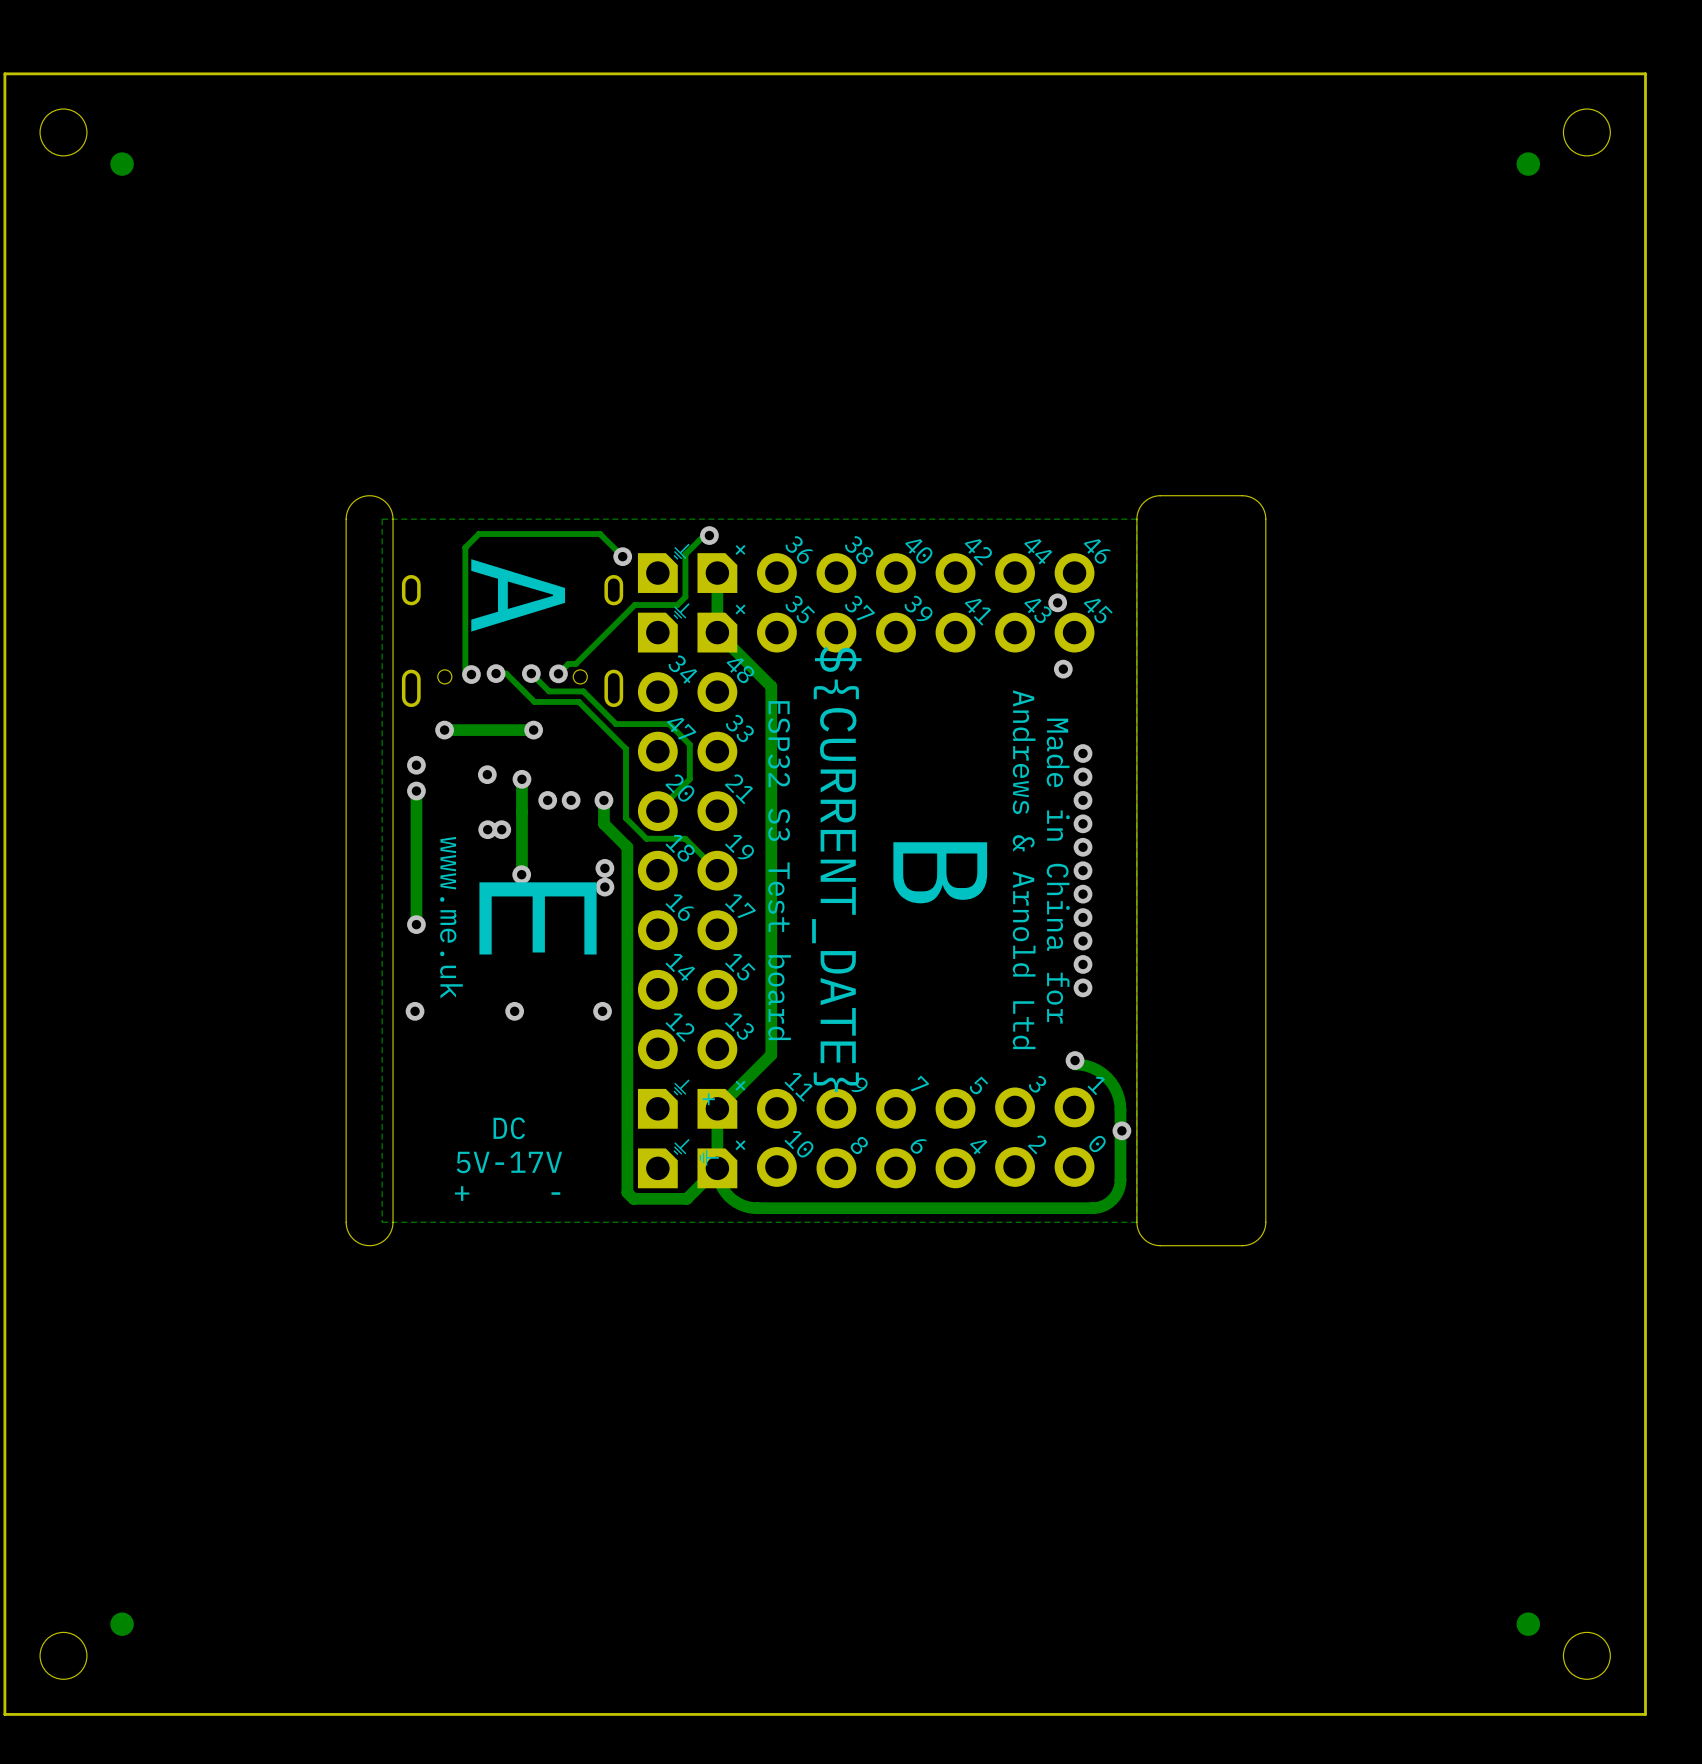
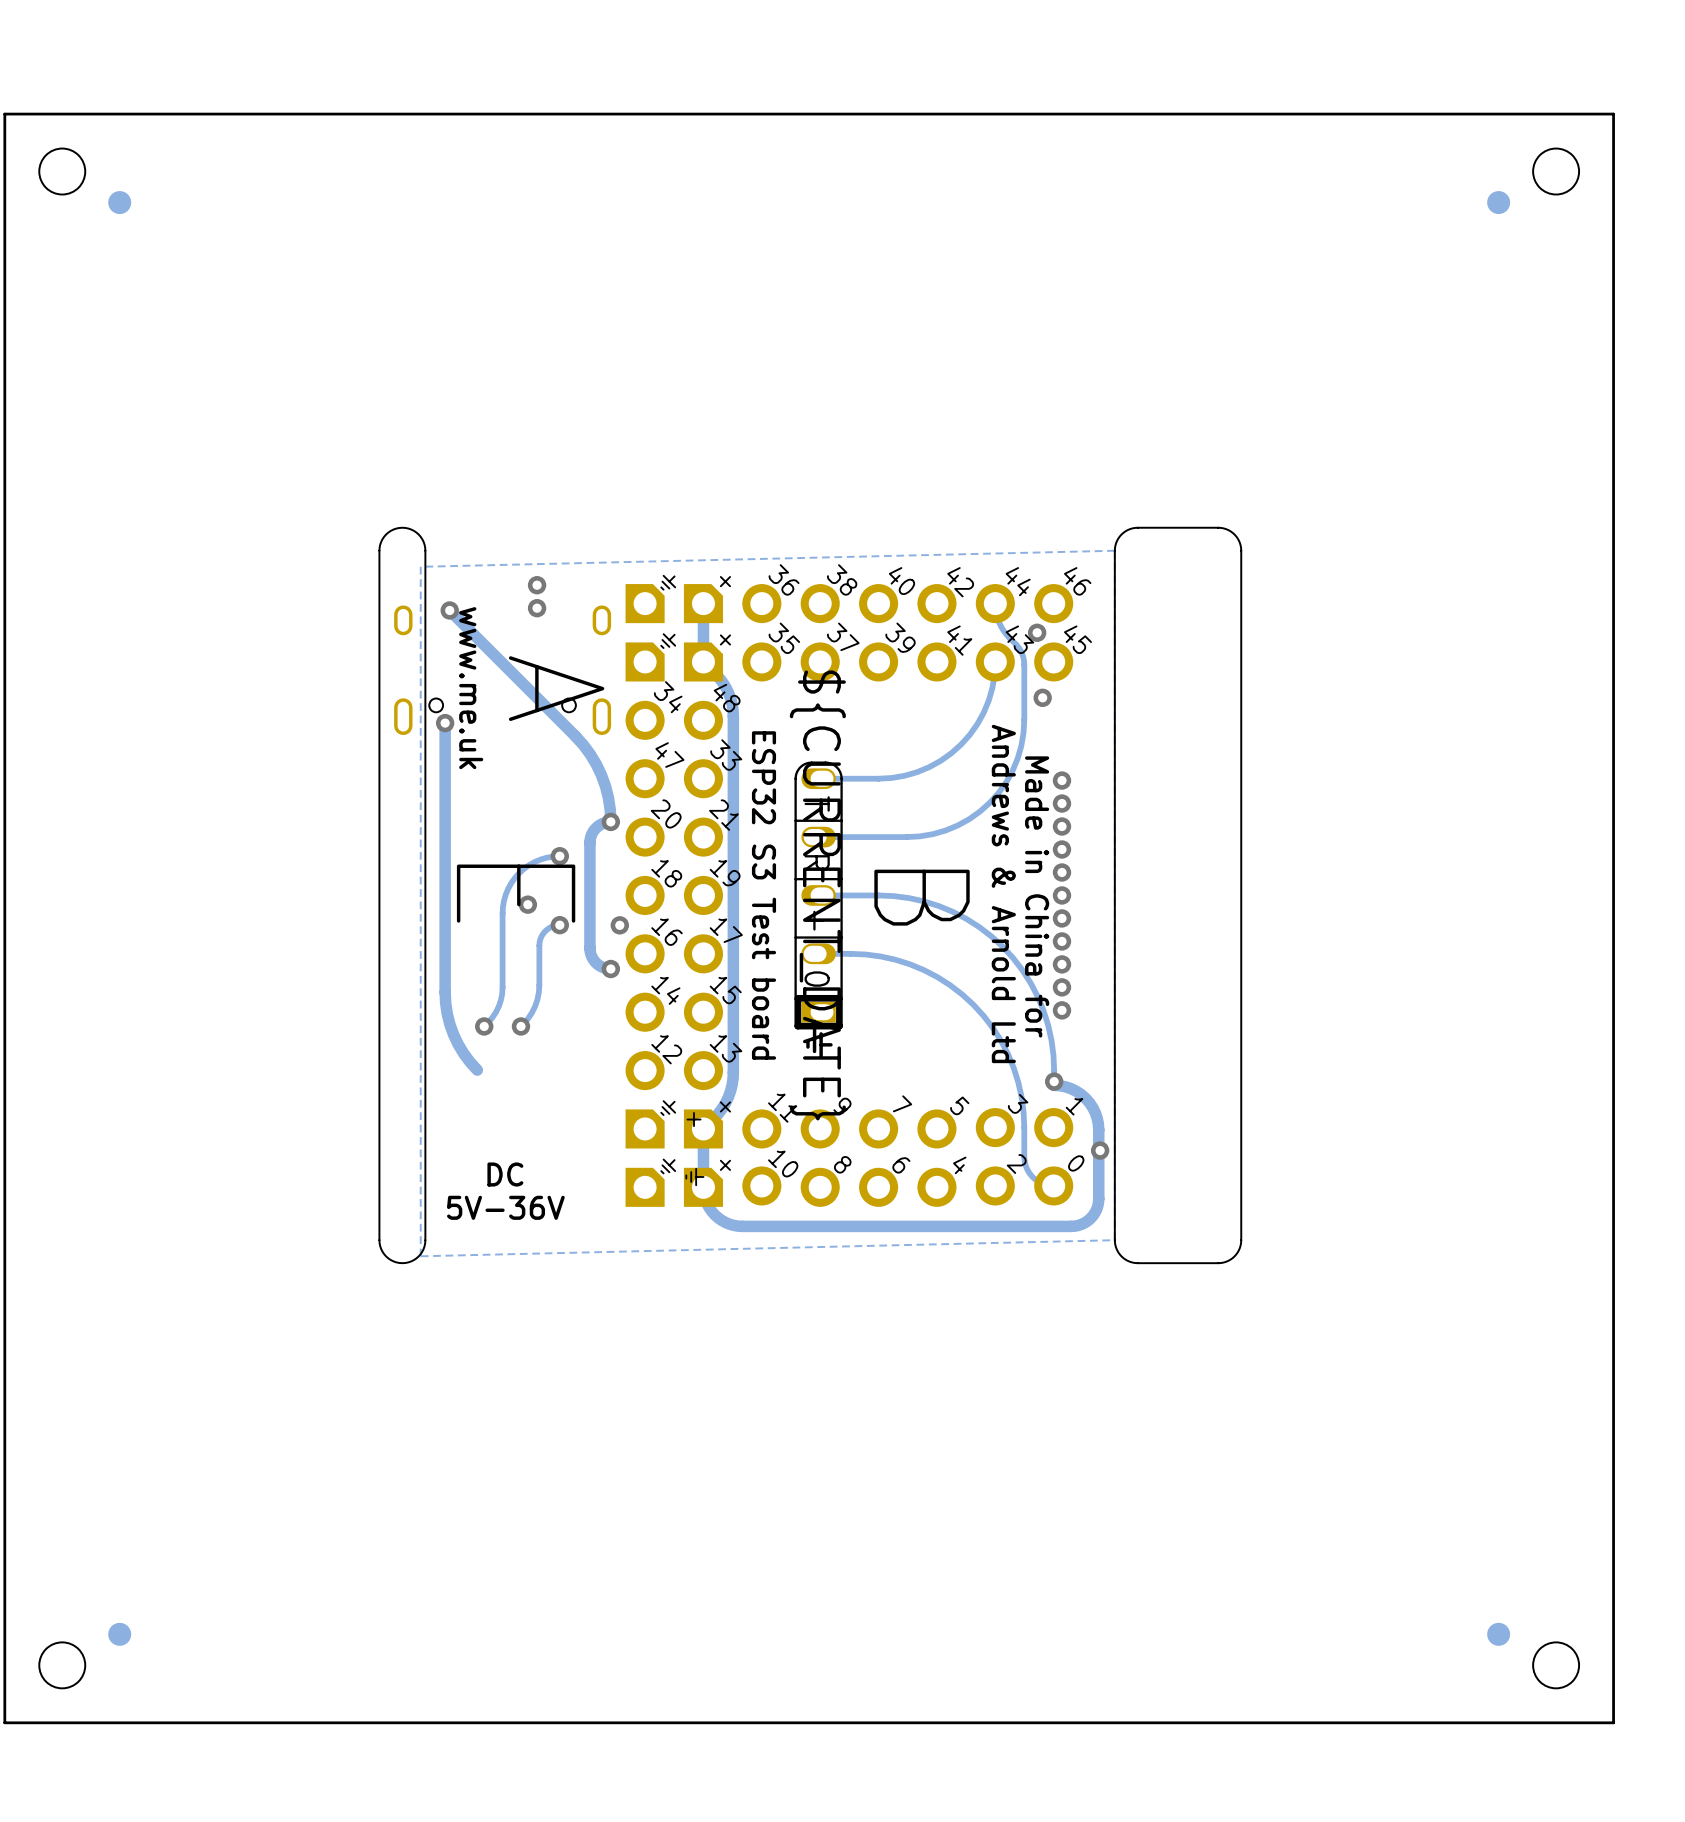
board edge: (393, 519) (393, 1222) (391, 1230) (387, 1237) (377, 1244) (369, 1245) (358, 1243) (352, 1237) (347, 1230) (346, 1222) (346, 519) (348, 508) (354, 501) (361, 497) (369, 495) (377, 497) (385, 501) (391, 510) (393, 519) -> none
board edge: none -> (425, 550) (425, 1240) (423, 1248) (418, 1256) (411, 1261) (402, 1263) (393, 1261) (386, 1256) (381, 1248) (379, 1240) (379, 550) (381, 541) (386, 534) (393, 529) (402, 527) (411, 529) (418, 534) (423, 541) (425, 550)
zone outline: (1136, 519) (382, 519) (382, 1222) (1136, 1222) -> (1114, 550) (420, 566) (420, 1256) (1114, 1240)
track: (709, 535) (704, 535) (685, 554) (685, 597) (677, 605) (634, 605) (575, 663) (568, 663) (558, 673) -> none
via: (709, 535) -> none
via: none -> (537, 585)
track: (622, 556) (600, 534) (478, 534) (465, 547) (465, 674) -> none
via: (622, 556) -> none
track: none -> (995, 603) (1001, 626) (1019, 648) (1024, 664) (1024, 719) (1021, 745) (1012, 770) (998, 792) (969, 819) (933, 834) (906, 837) (815, 837)
via: none -> (537, 608)
track: none -> (449, 610) (575, 735) (590, 754) (601, 775) (608, 798) (610, 821) (598, 826) (592, 832) (590, 840) (589, 948) (591, 956) (596, 962) (602, 967) (610, 969)
via: none -> (449, 610)
text position: A (518, 595) -> A (556, 688)
track: (717, 632) (771, 686) (771, 1054) (728, 1097) -> (716, 674) (728, 693) (733, 716) (733, 1072) (728, 1097) (714, 1117)
track: none -> (995, 661) (988, 700) (977, 724) (961, 744) (940, 760) (917, 772) (891, 777) (822, 778)
track: (496, 673) (506, 673) (534, 701) (578, 701) (625, 748) -> none
via: (496, 673) -> none
track: (531, 673) (549, 691) (583, 691) (616, 724) (669, 724) (689, 744) (689, 779) (657, 811) -> none
via: (531, 673) -> none
via: (558, 673) -> none
via: (471, 674) -> none
track: none -> (445, 723) (445, 1003) (453, 1034) (463, 1053) (477, 1070)
via: none -> (445, 723)
via: (444, 730) -> none
track: (533, 730) (444, 730) -> none
via: (533, 730) -> none
track: (625, 748) (625, 818) (646, 838) (685, 838) (717, 870) -> none
via: (416, 765) -> none
via: (487, 774) -> none
track: (521, 779) (521, 874) -> none
via: (521, 779) -> none
track: (416, 791) (416, 924) -> none
via: (416, 791) -> none
via: (547, 800) -> none
via: (571, 800) -> none
track: (603, 800) (603, 823) (627, 847) (627, 1192) (633, 1198) (686, 1198) (717, 1168) -> none
via position: (603, 800) -> (610, 821)
via: (487, 829) -> none
via: (501, 829) -> none
track: none -> (559, 856) (540, 859) (529, 864) (515, 877) (508, 888) (502, 907) (502, 993) (495, 1012) (484, 1026)
via: none -> (559, 856)
via: (604, 868) -> none
part: none -> (818, 895)
track: none -> (822, 895) (894, 896) (924, 901) (952, 911) (991, 936) (1022, 970) (1037, 996) (1051, 1040) (1054, 1081)
via position: (521, 874) -> (527, 904)
via: (604, 887) -> none
track: none -> (559, 925) (547, 929) (540, 938) (537, 999) (531, 1012) (520, 1026)
via: none -> (559, 925)
via: none -> (619, 925)
text position: www.me.uk (451, 917) -> www.me.uk (471, 688)
text position: E (538, 918) -> E (516, 893)
via: (416, 924) -> none
track: none -> (815, 953) (865, 954) (909, 964) (937, 977) (973, 1004) (992, 1027) (1013, 1068) (1021, 1097) (1024, 1159) (1027, 1169) (1038, 1181) (1053, 1185)
via: none -> (610, 969)
via: none -> (484, 1026)
via: (415, 1011) -> none
via position: (514, 1011) -> (520, 1026)
via: (602, 1011) -> none
text position: DC (509, 1128) -> DC (505, 1174)
text: 5V-17V (509, 1162) -> 5V-36V (505, 1207)
text: + (462, 1193) -> none
text: - (555, 1193) -> none

